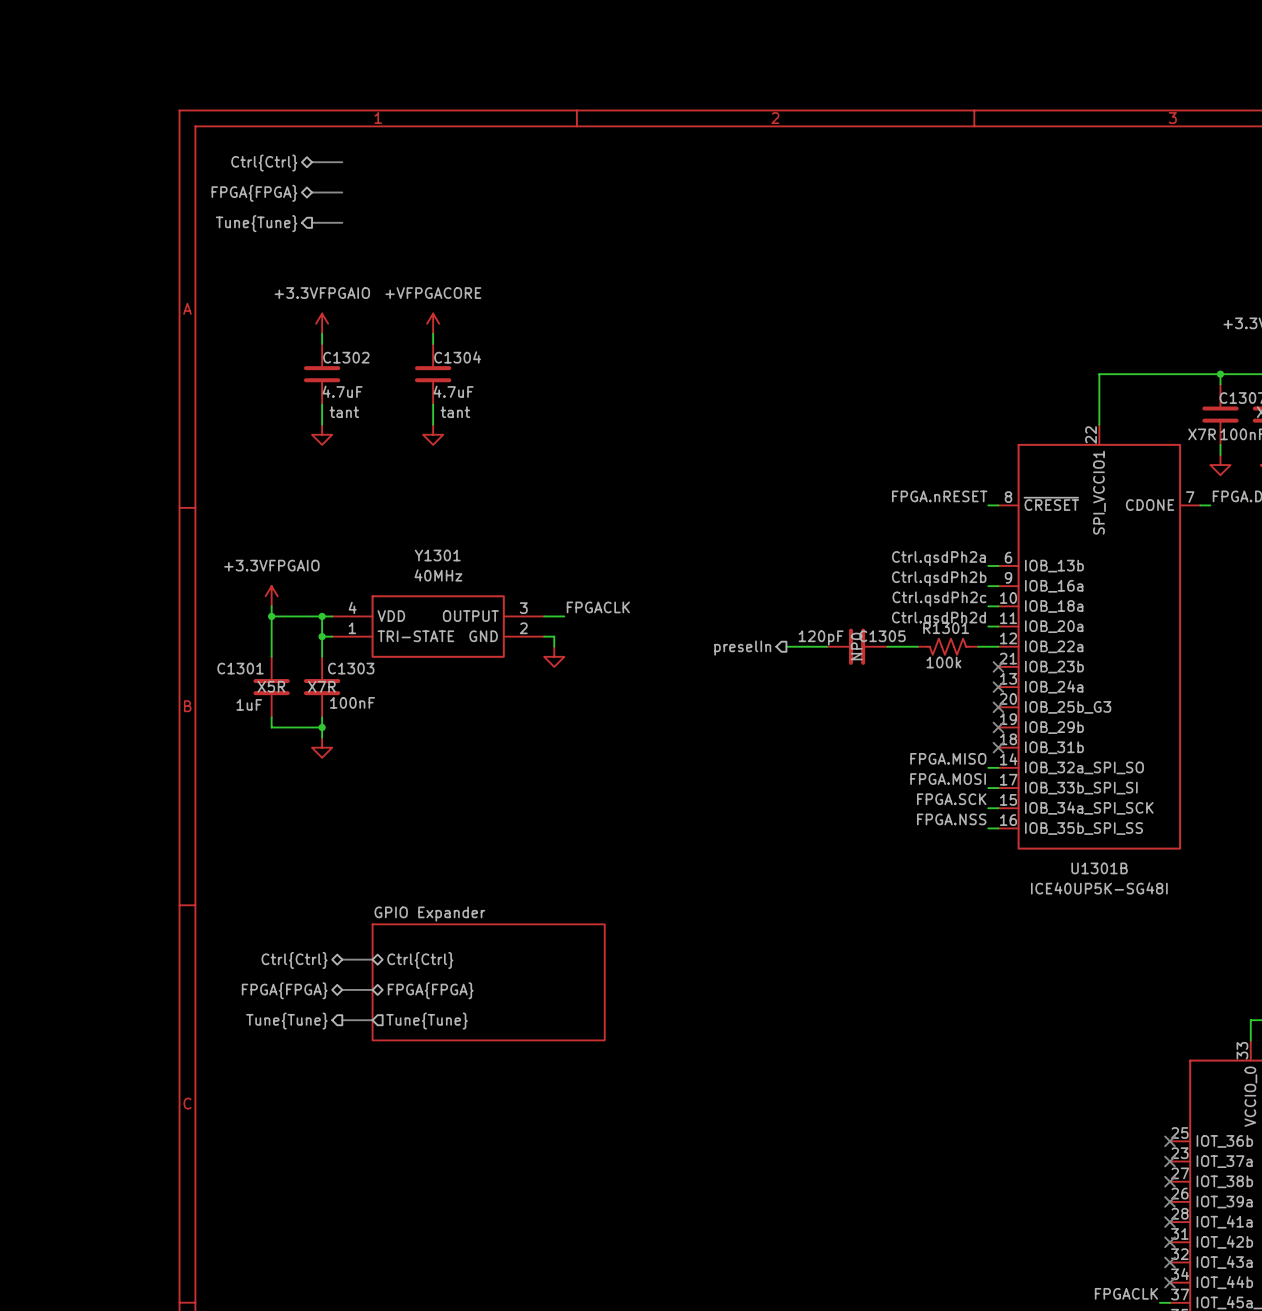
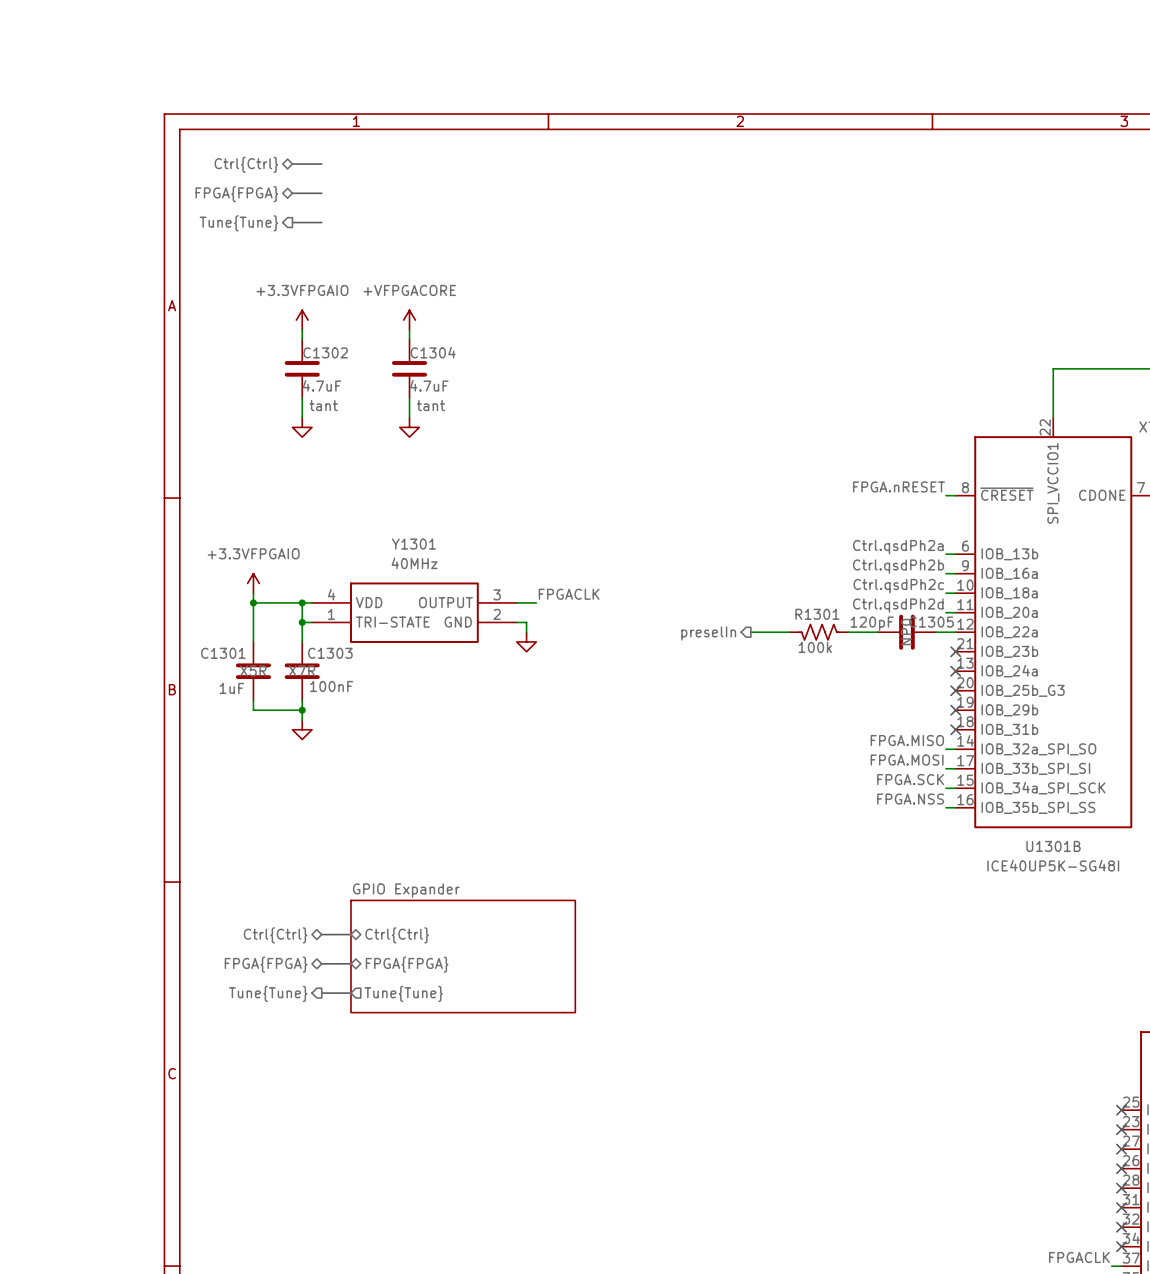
C1305 position: (857, 646) -> (906, 632)
R1301 position: (947, 646) -> (819, 632)

